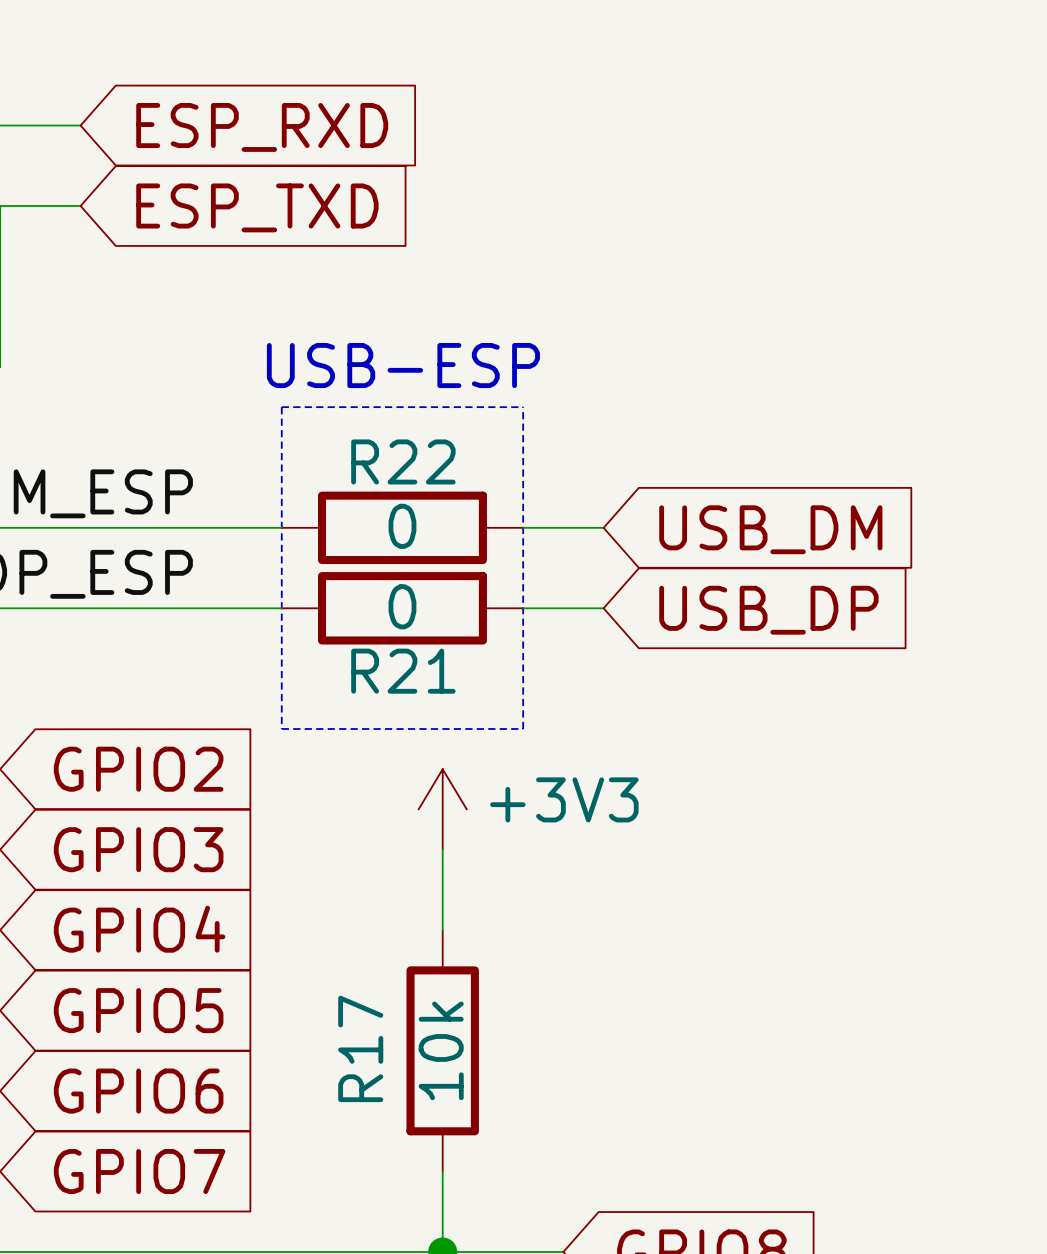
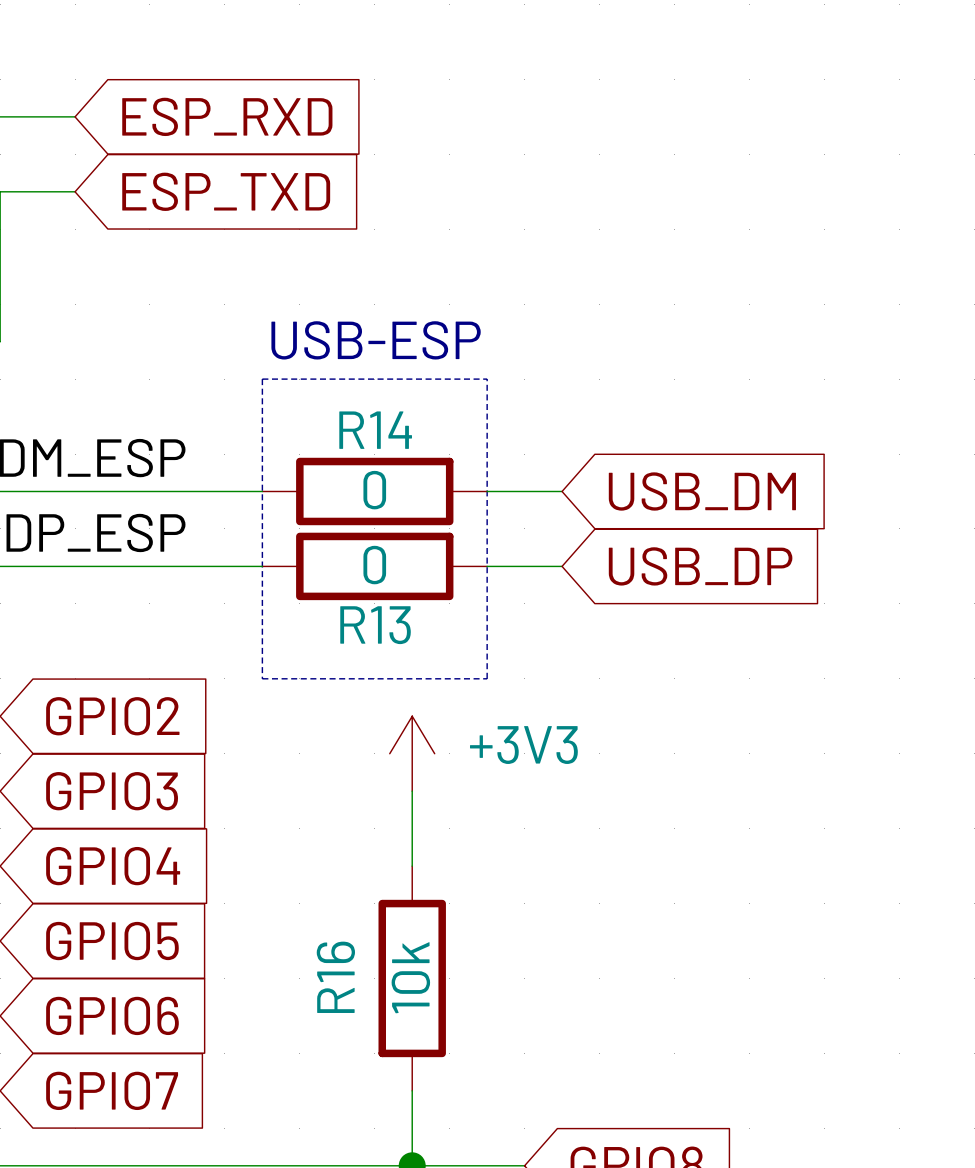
R22 name: R22 (403, 461) -> R14 (375, 430)
R21 name: R21 (403, 671) -> R13 (375, 625)
R17 name: R17 (360, 1048) -> R16 (335, 977)

